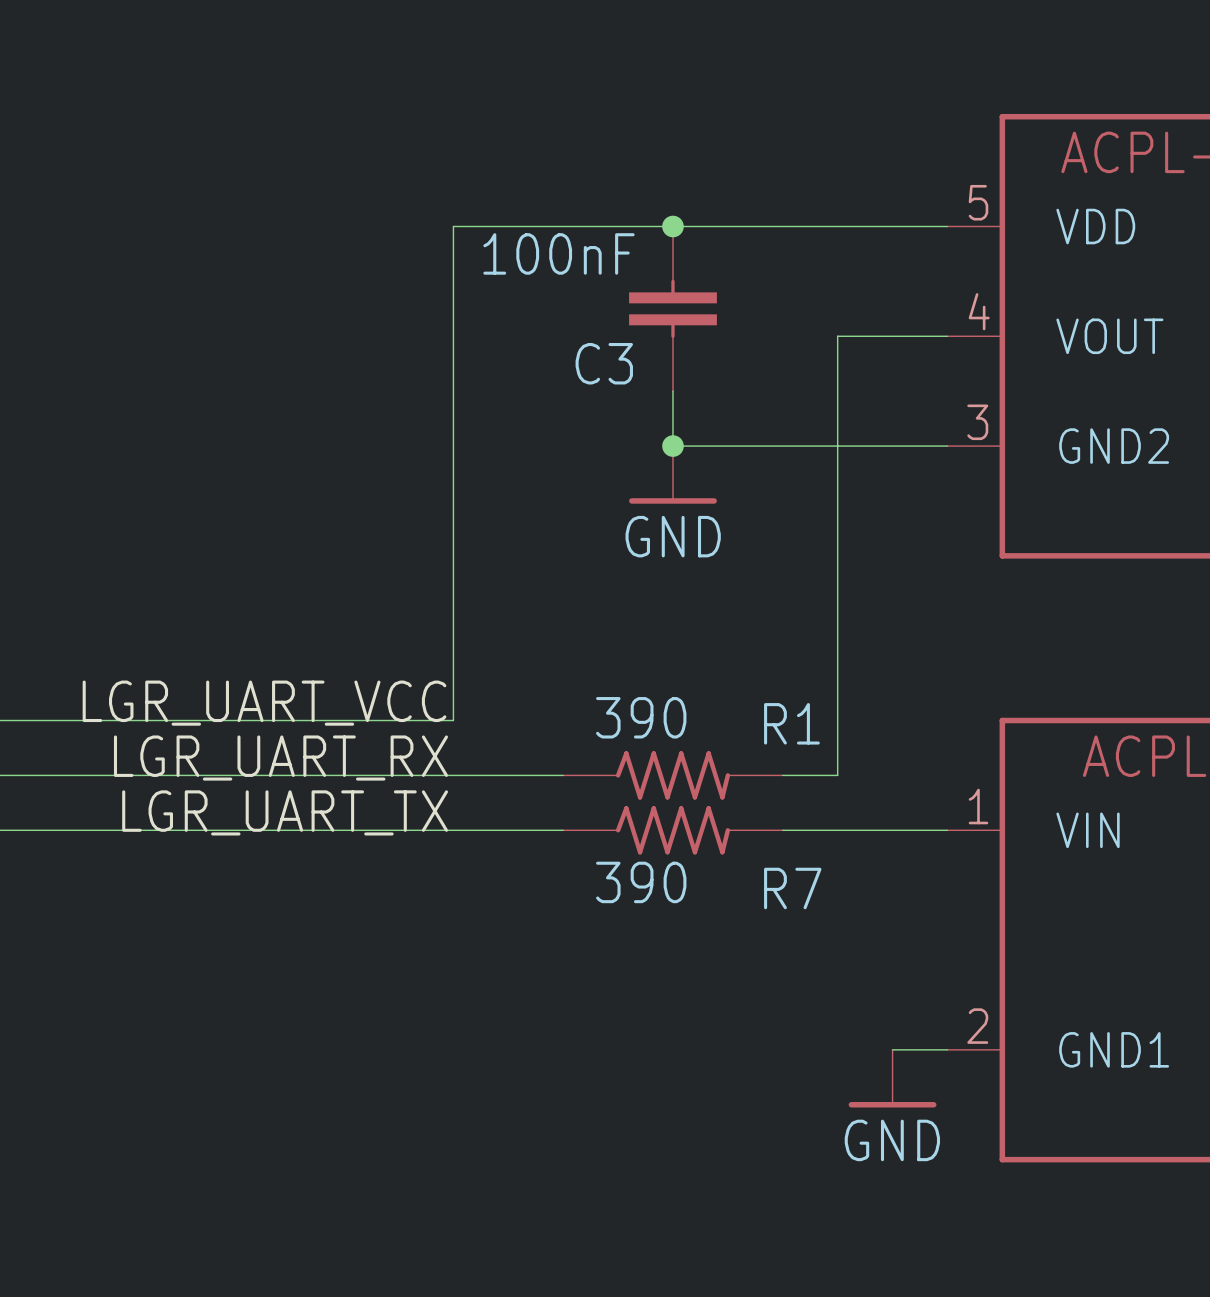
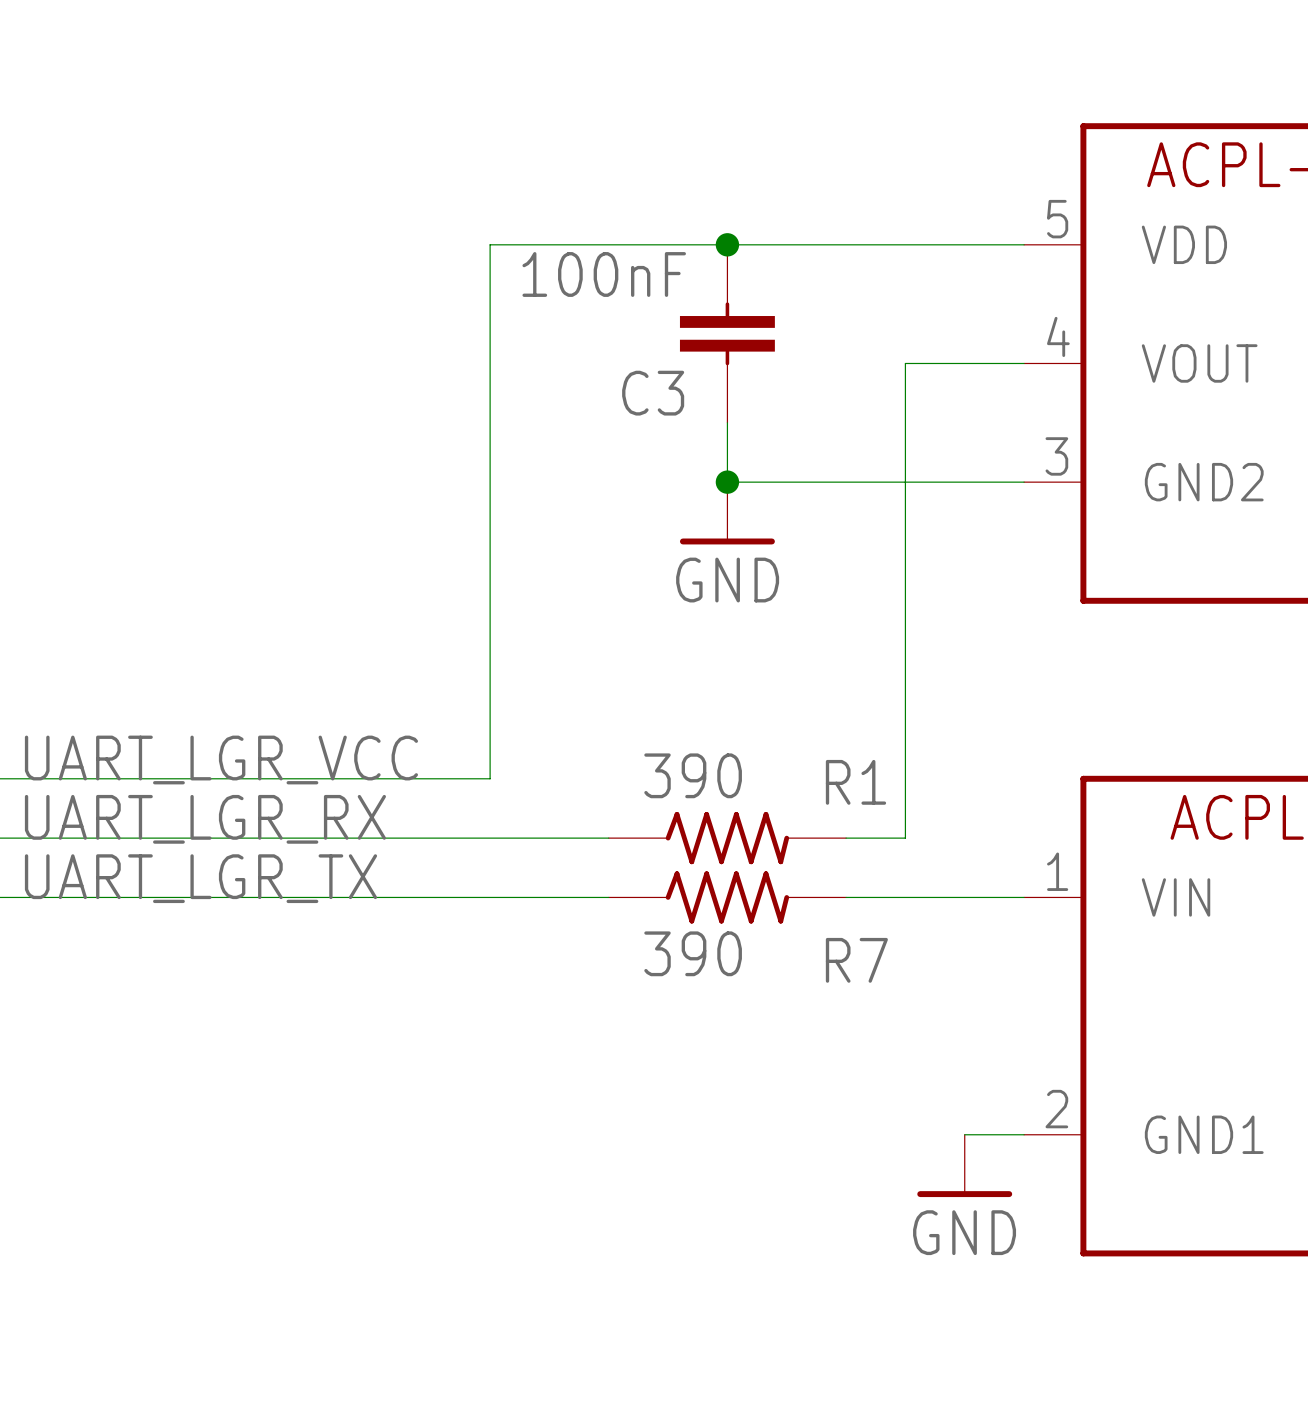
label: LGR_UART_VCC (264, 703) -> UART_LGR_VCC (221, 760)
label: none -> UART_LGR_RX (205, 819)
label: LGR_UART_RX (280, 758) -> none
label: none -> UART_LGR_TX (200, 878)
label: LGR_UART_TX (285, 812) -> none

